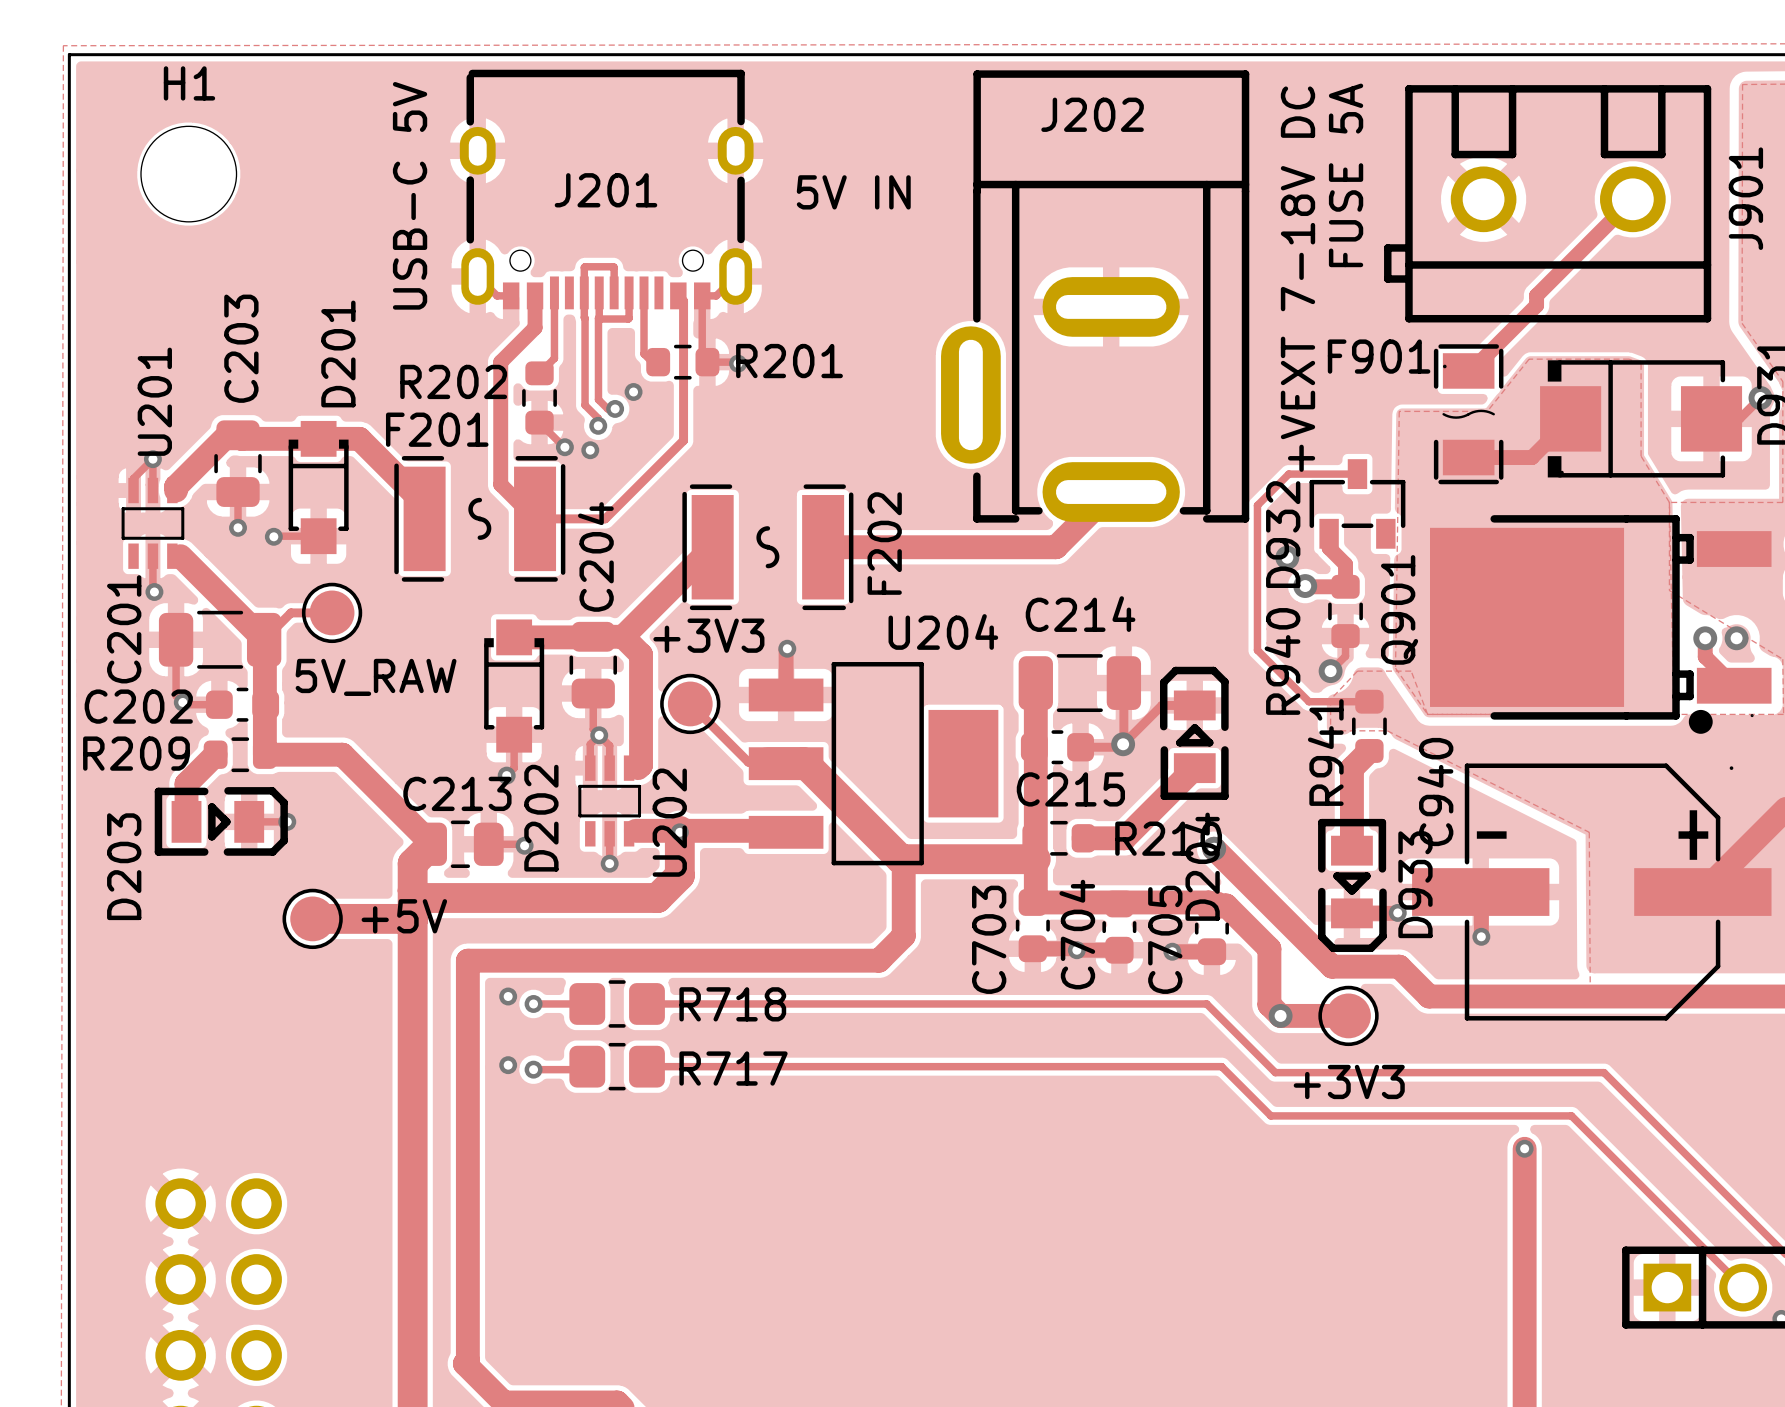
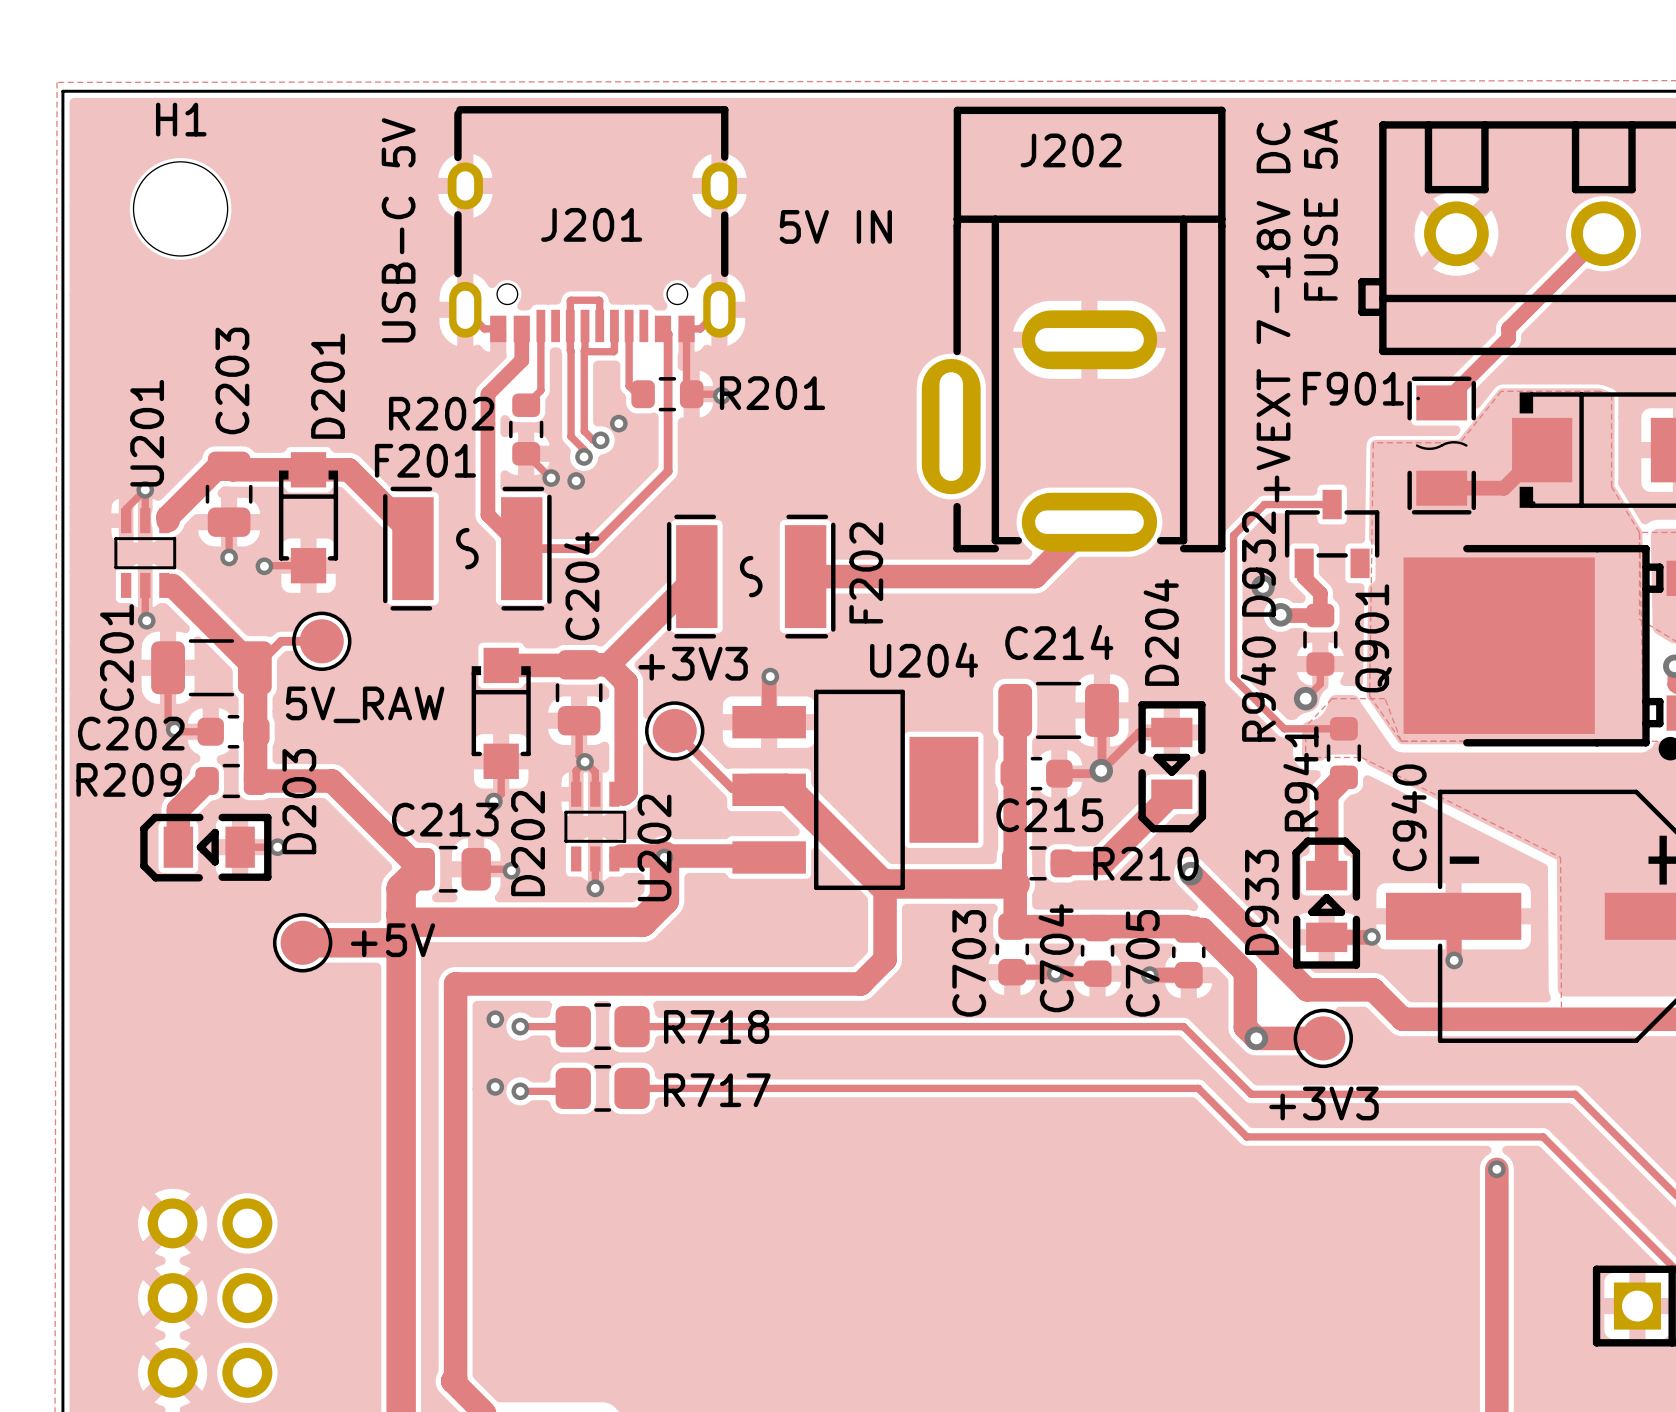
D204 rotation: 0° (1194, 733) -> 180° (1172, 766)
D203 rotation: 0° (221, 821) -> 180° (205, 847)
D933 rotation: 0° (1352, 885) -> 180° (1326, 903)

